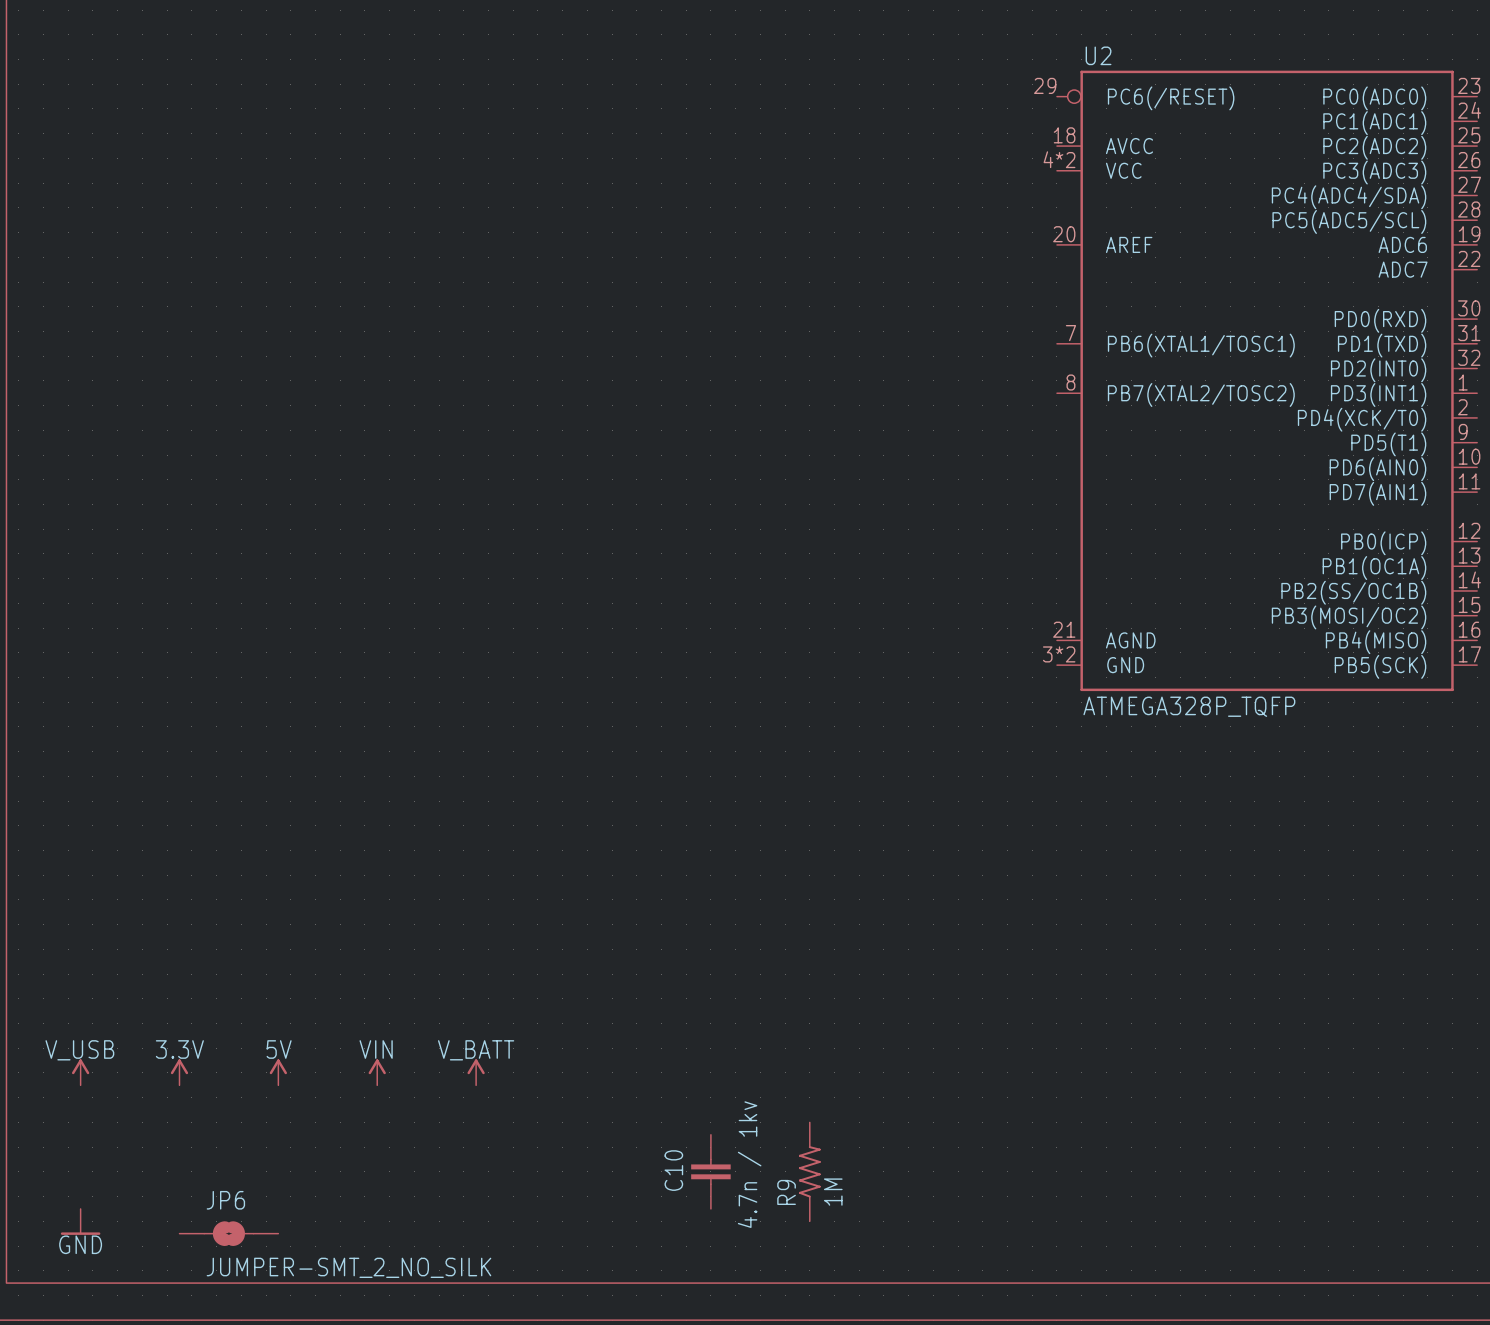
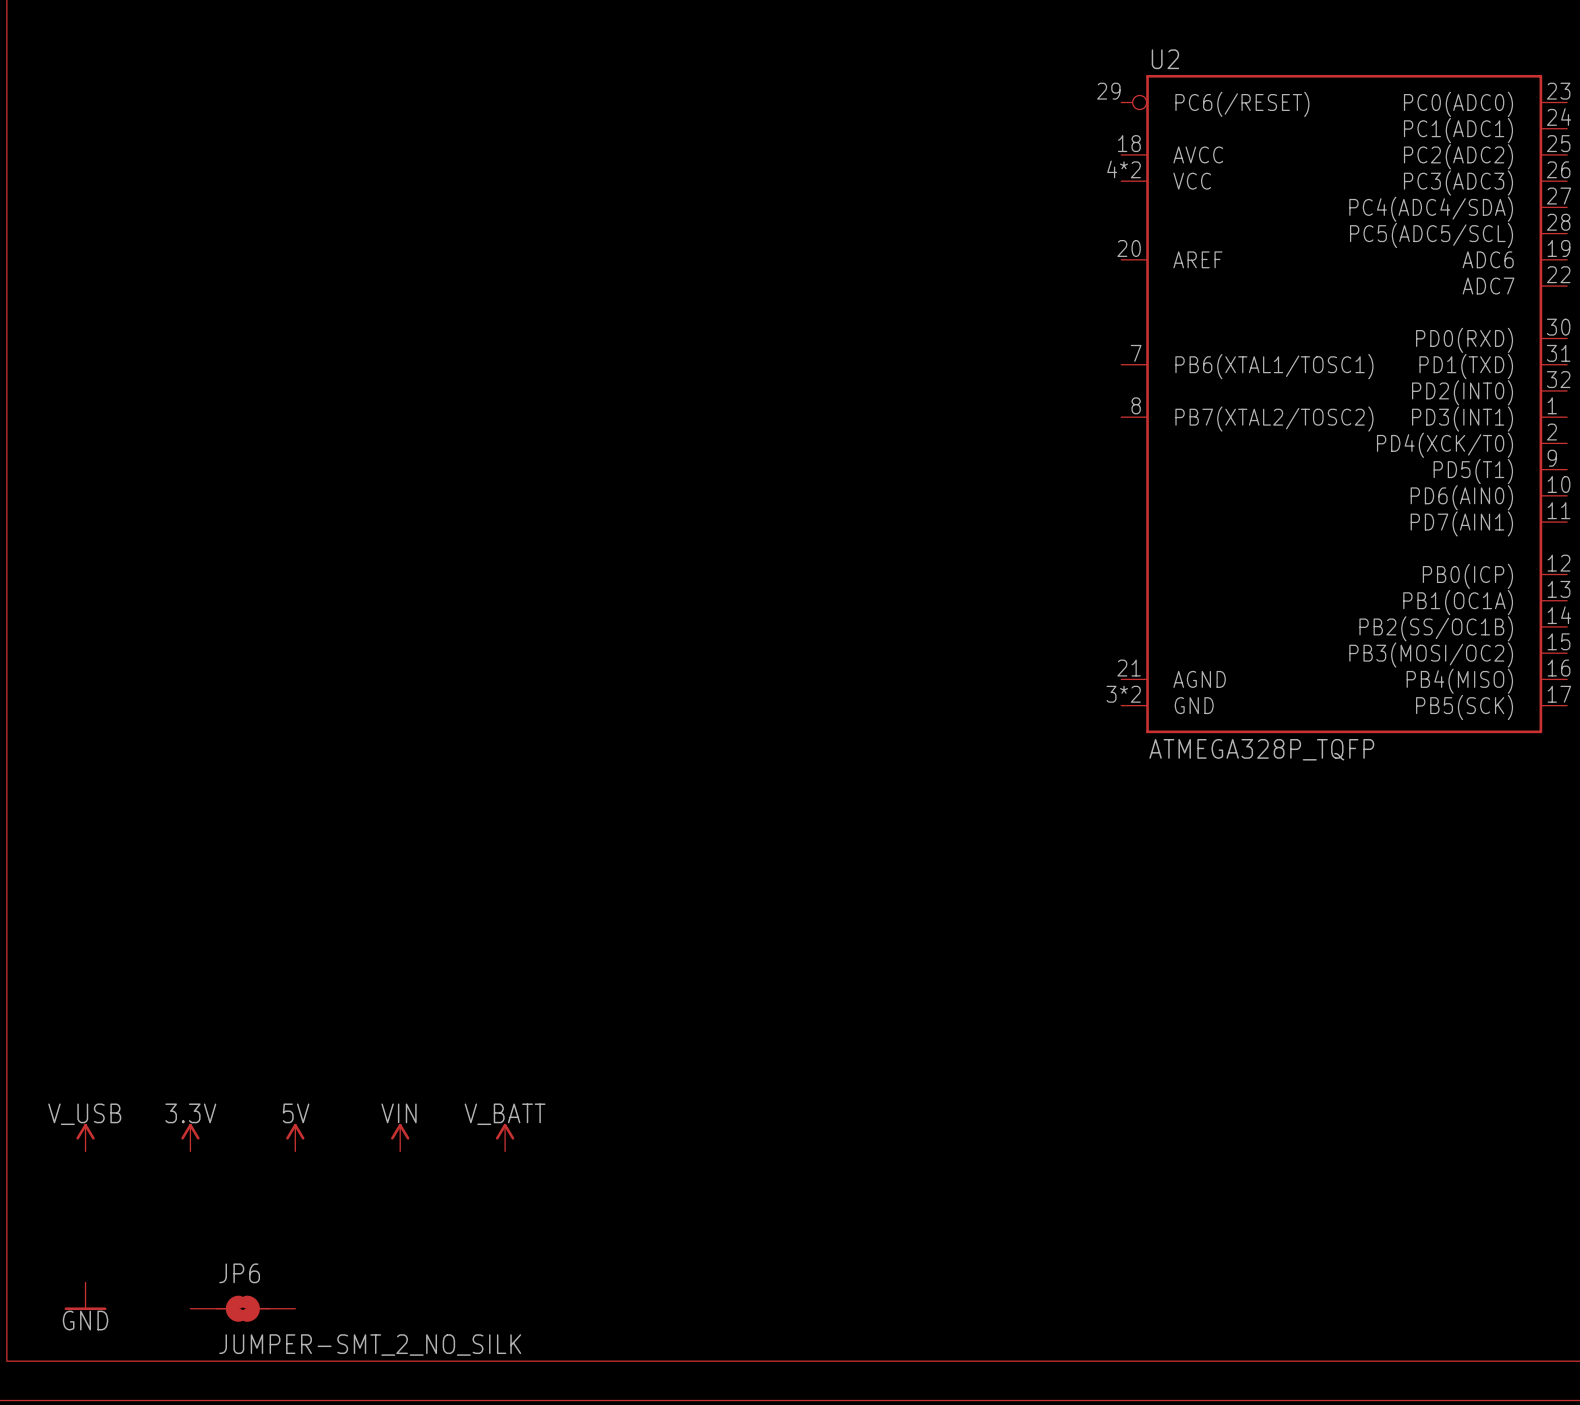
C10: 4.7n / 1kv (710, 1171) -> none
R9: 1M (809, 1171) -> none

